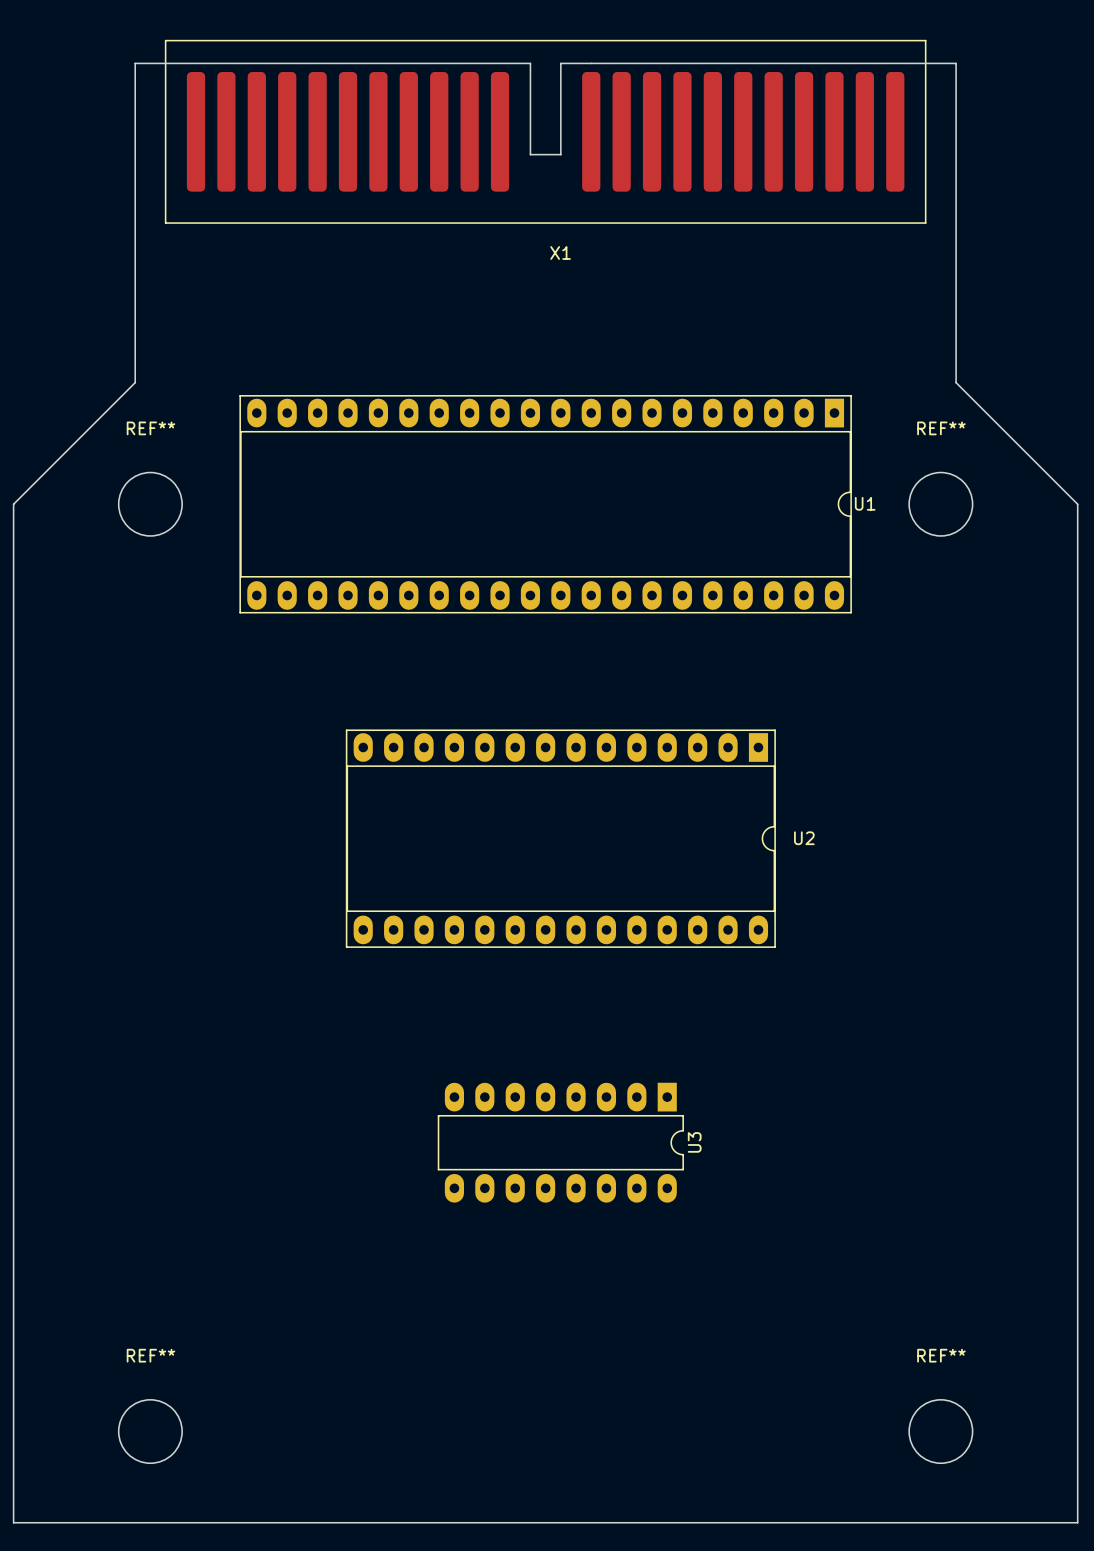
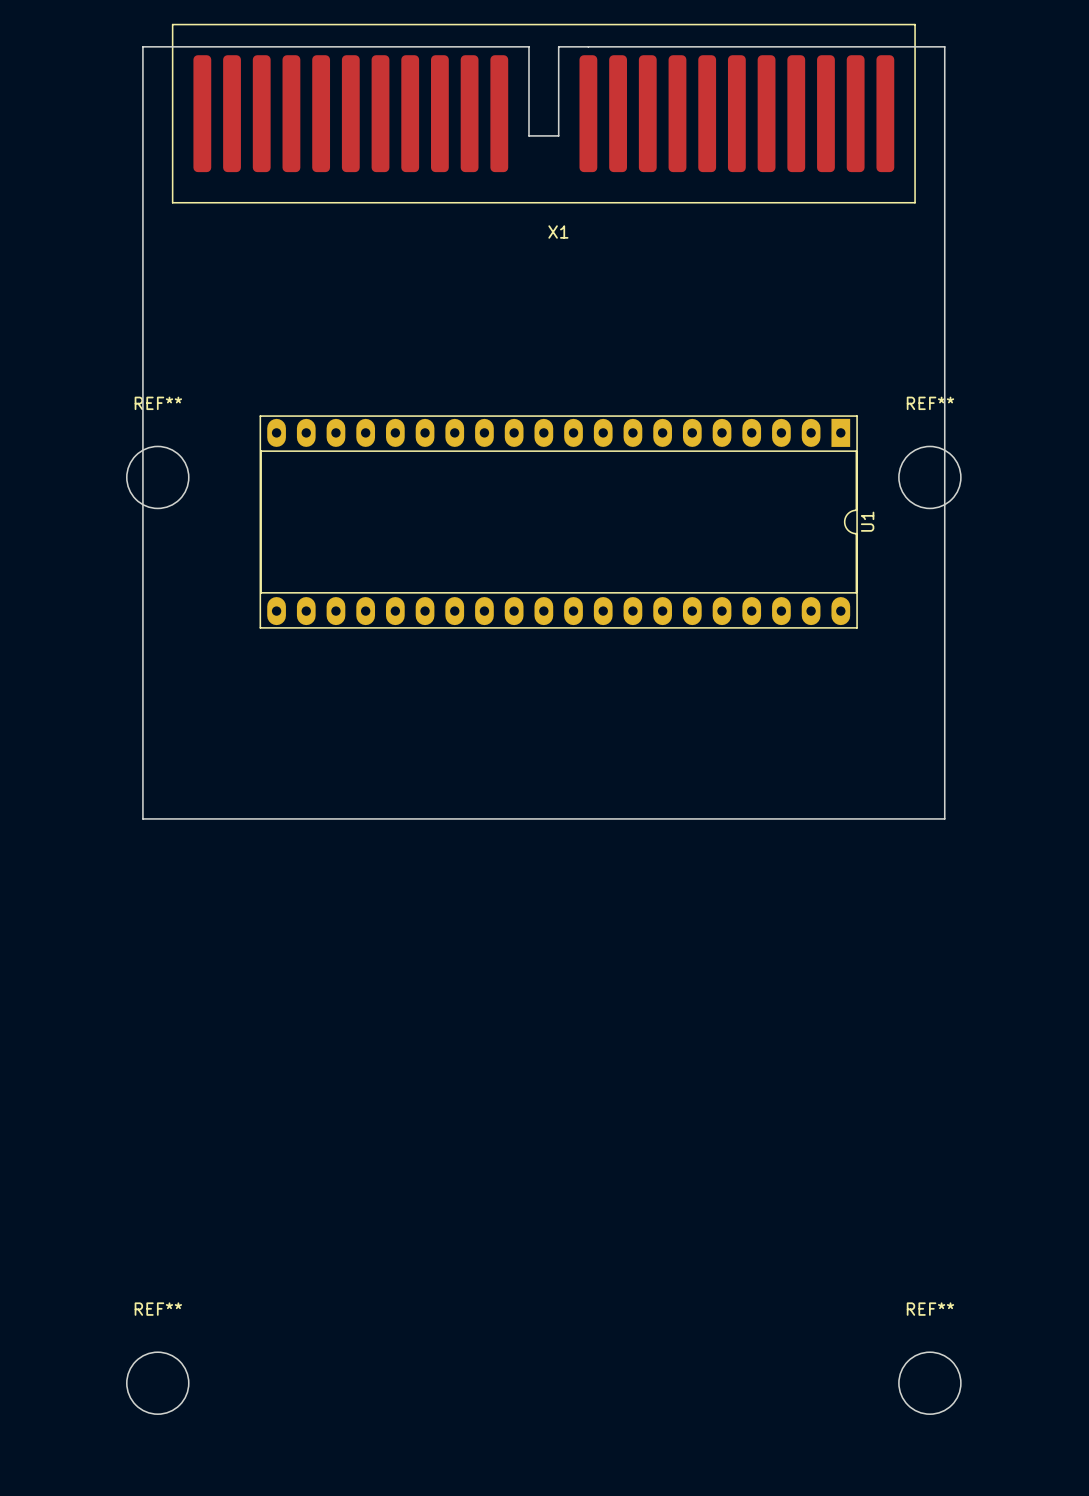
board edge: (135, 382) (13, 504) (13, 1522) (1077, 1522) (1077, 504) (956, 382) -> (142, 358) (142, 818) (944, 818) (944, 358)
U1 name rotation: 0° (865, 503) -> 90° counterclockwise (867, 521)
U1 position: (545, 504) -> (558, 521)
U2: (560, 838) -> none
U3: (560, 1142) -> none

